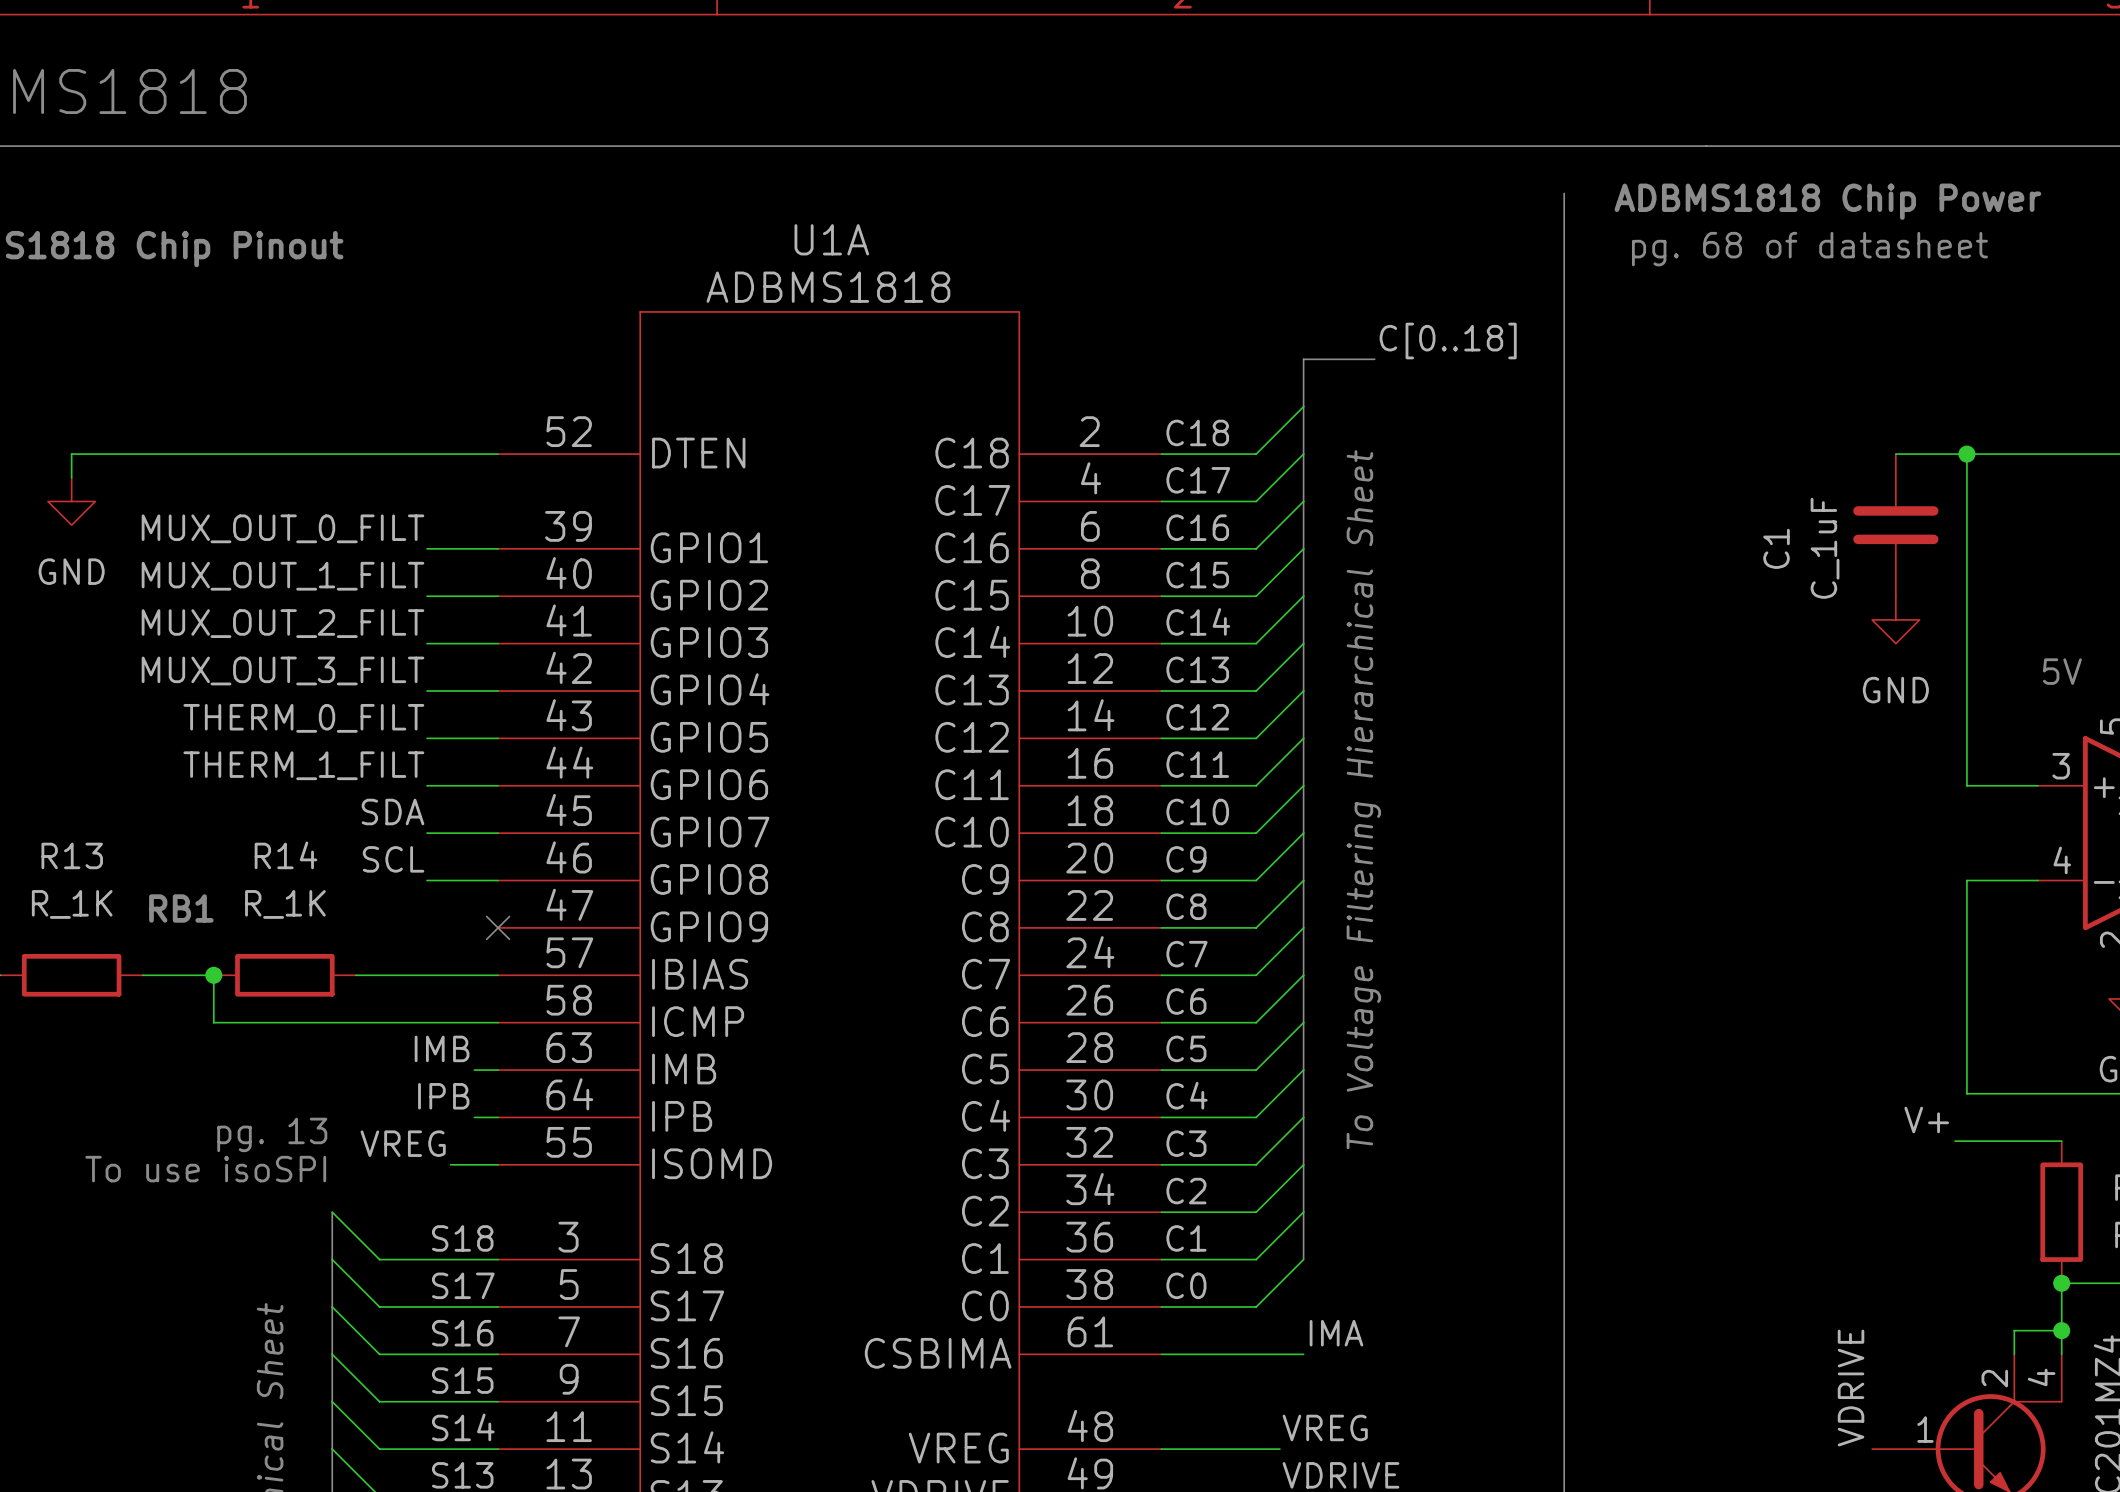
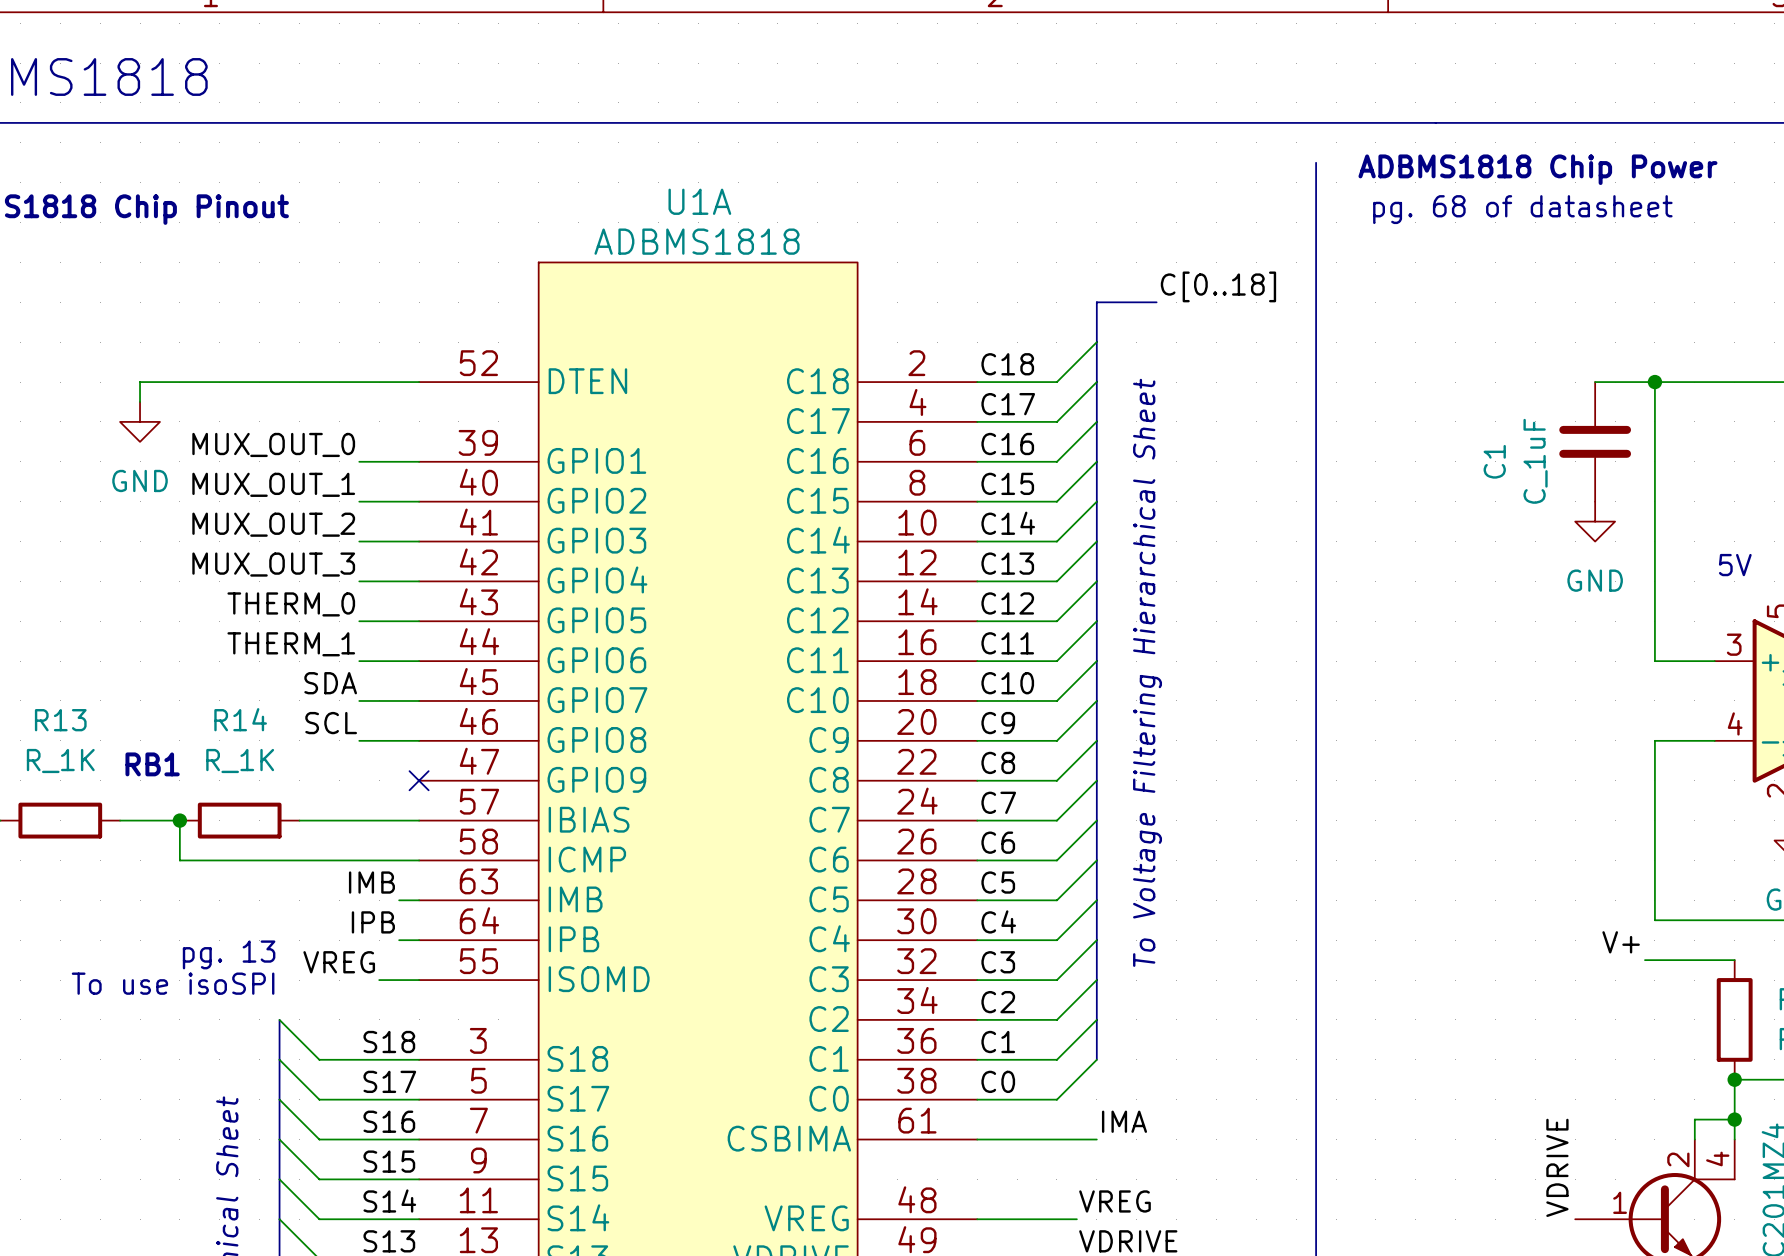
wire: (166, 454) (71, 454) (71, 477) -> (140, 382) (140, 401)
power symbol position: GND (71, 501) -> GND (140, 421)
label: MUX_OUT_0_FILT (283, 528) -> MUX_OUT_0 (273, 444)
label: MUX_OUT_1_FILT (283, 576) -> MUX_OUT_1 (273, 484)
label: MUX_OUT_2_FILT (283, 623) -> MUX_OUT_2 (273, 524)
label: MUX_OUT_3_FILT (283, 670) -> MUX_OUT_3 (273, 564)
label: THERM_0_FILT (303, 718) -> THERM_0 (291, 604)
label: THERM_1_FILT (303, 765) -> THERM_1 (291, 644)

